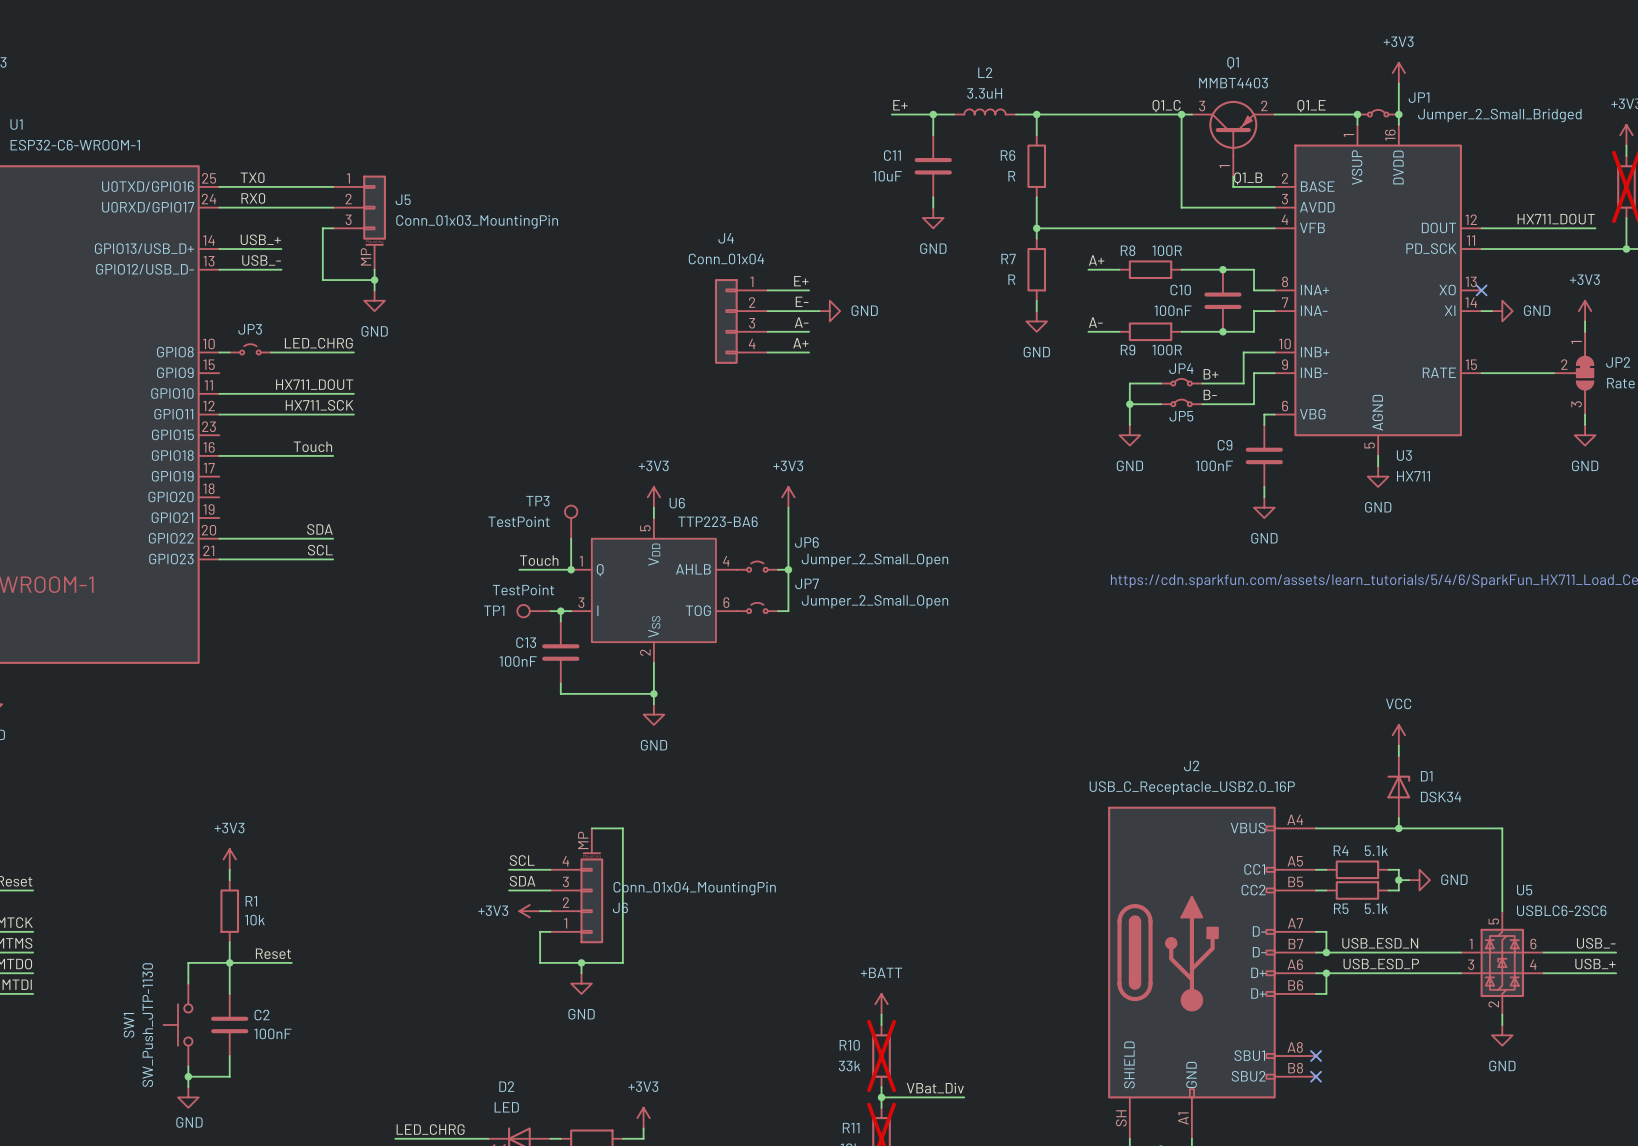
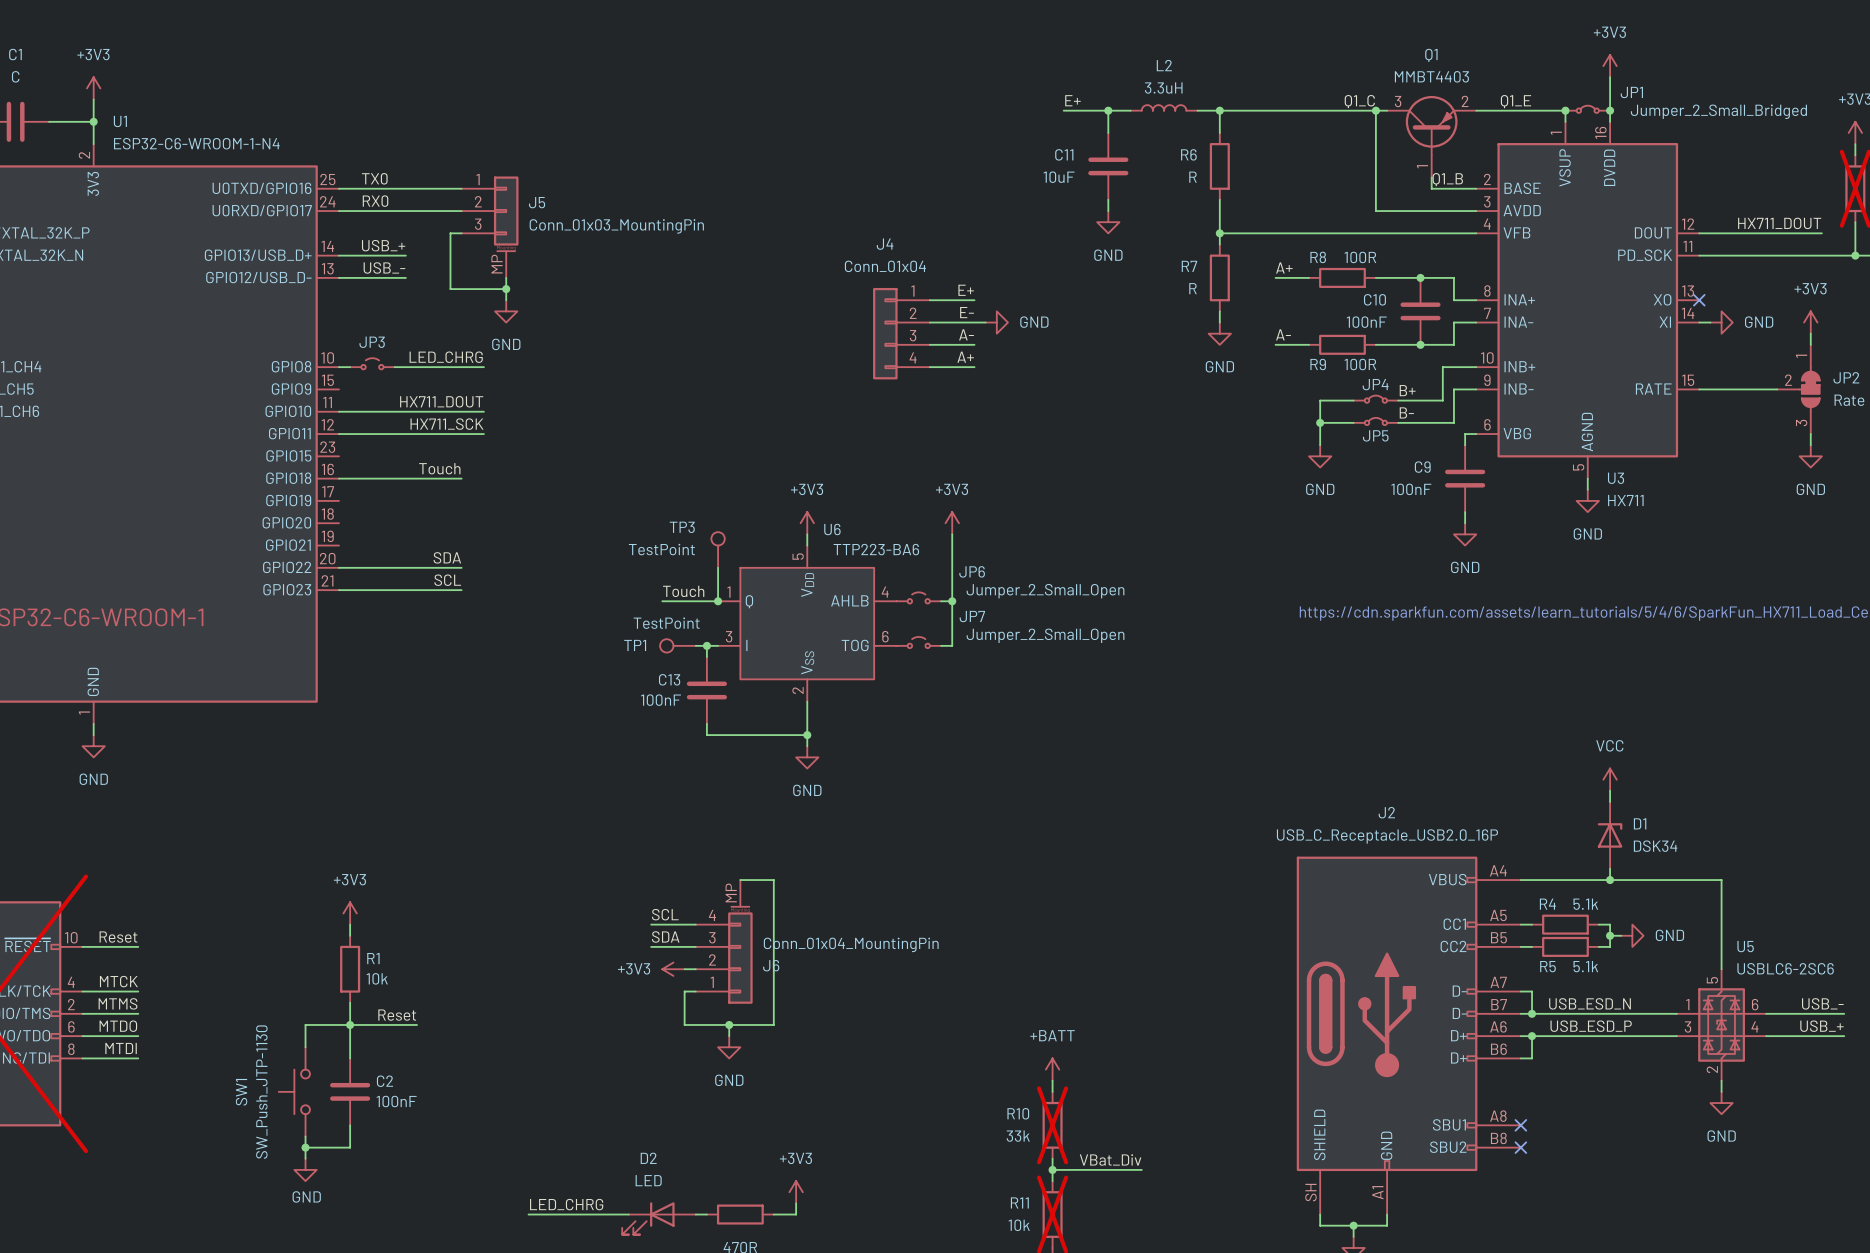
U1 value: ESP32-C6-WROOM-1 (75, 145) -> ESP32-C6-WROOM-1-N4 (196, 143)

